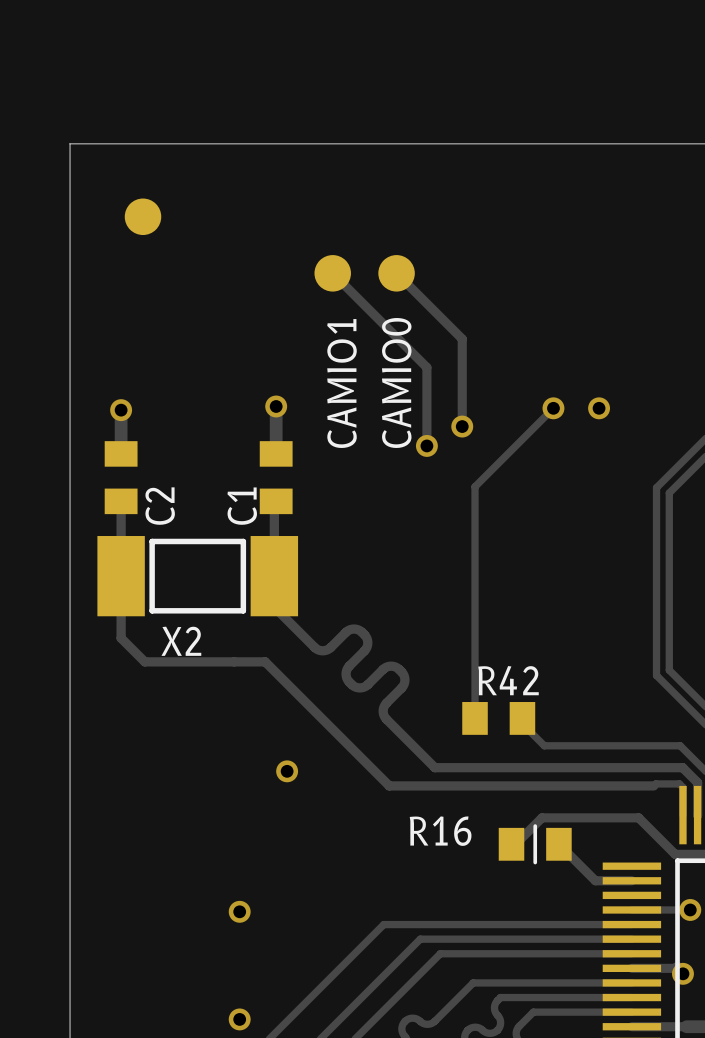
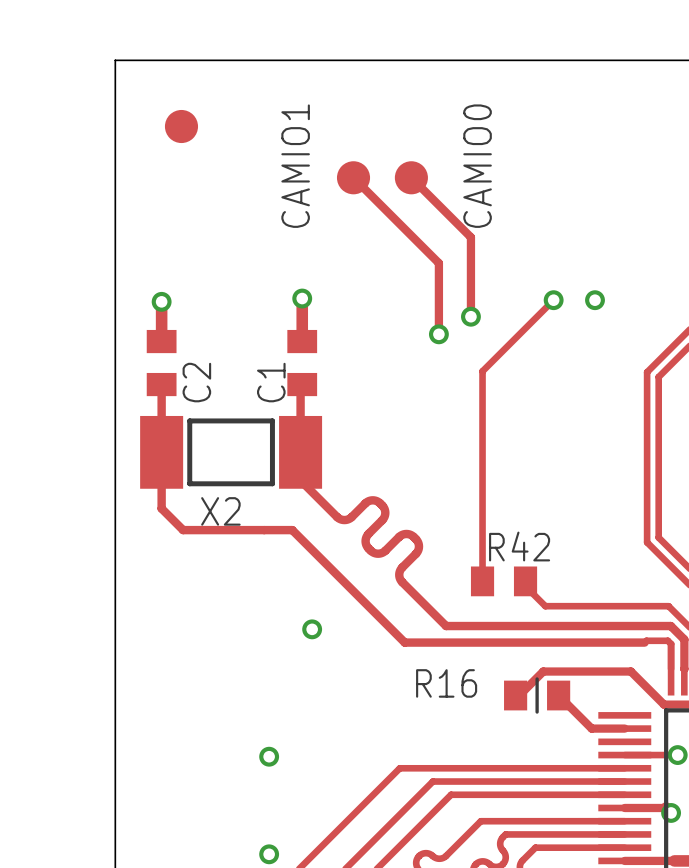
CAMIO1 name position: CAMIO1 (342, 383) -> CAMIO1 (295, 166)
CAMIO0 name position: CAMIO0 (396, 383) -> CAMIO0 (477, 166)

